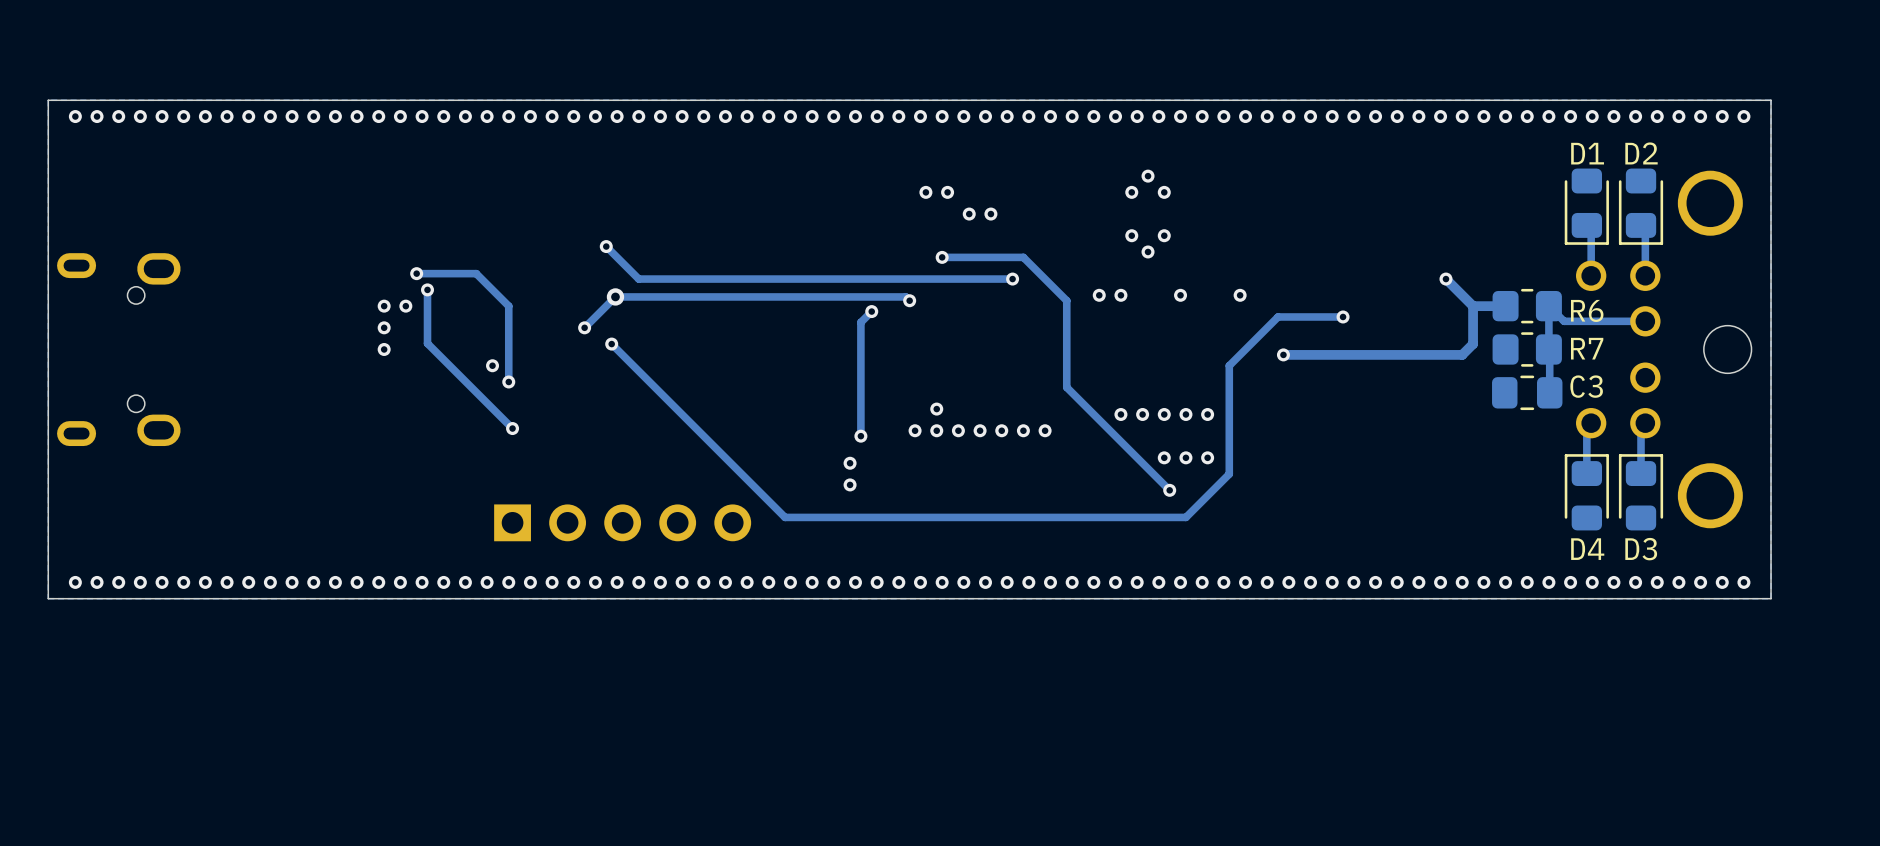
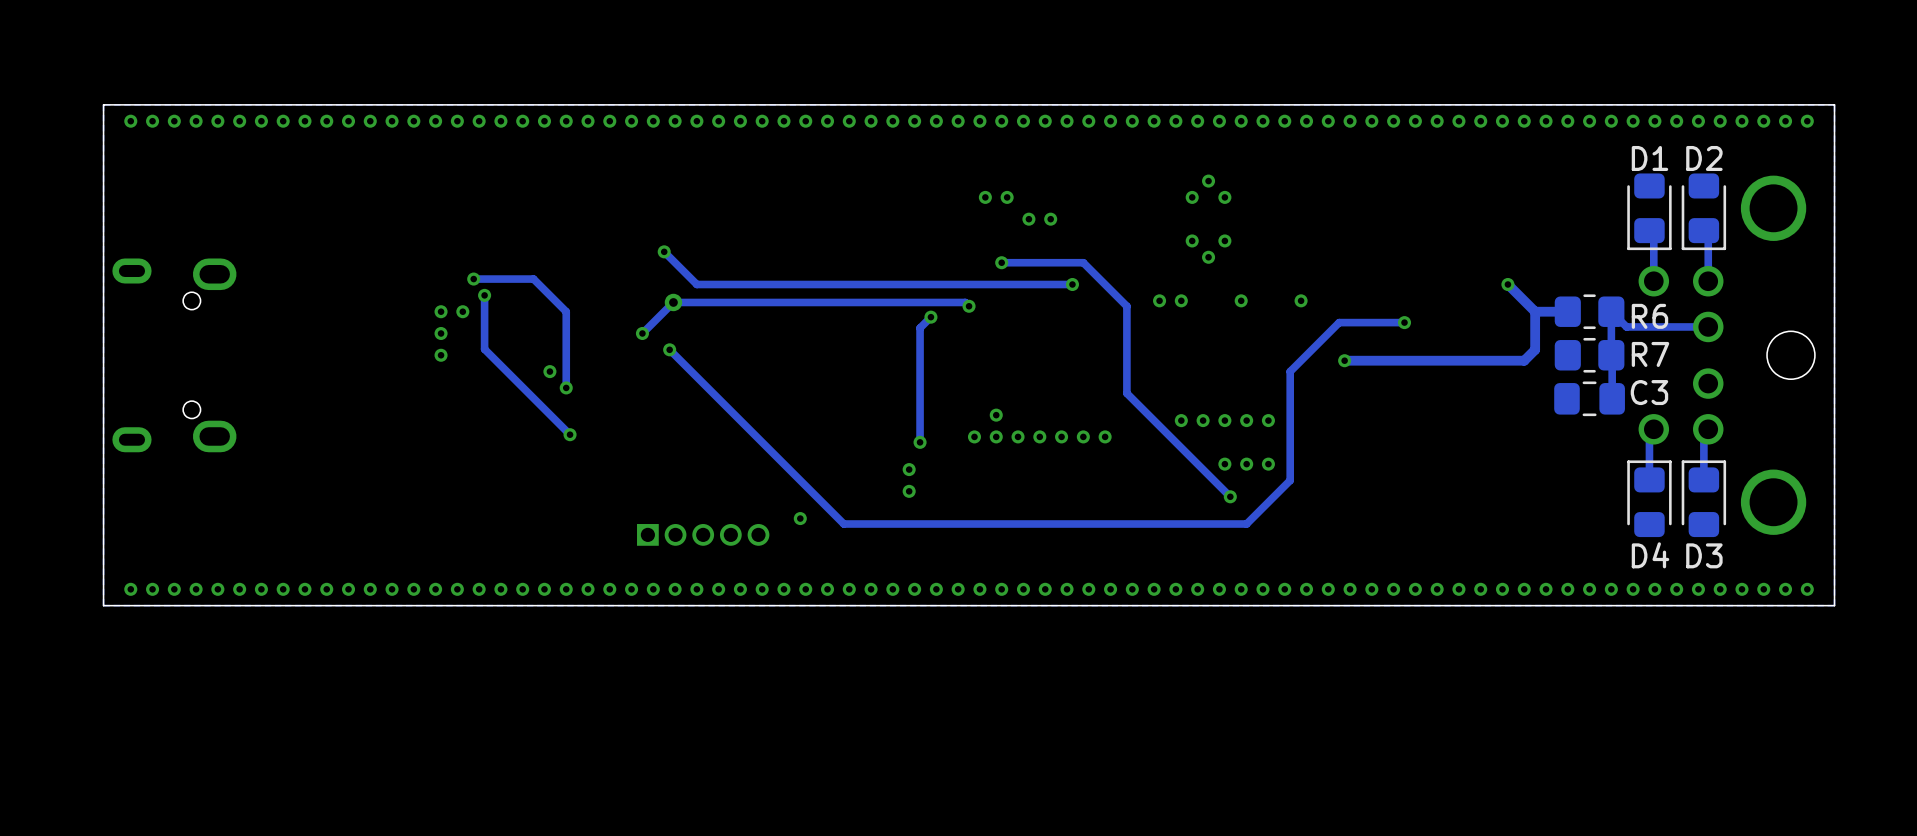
via: none -> (800, 518)
part: (622, 522) -> none
part: none -> (703, 534)

